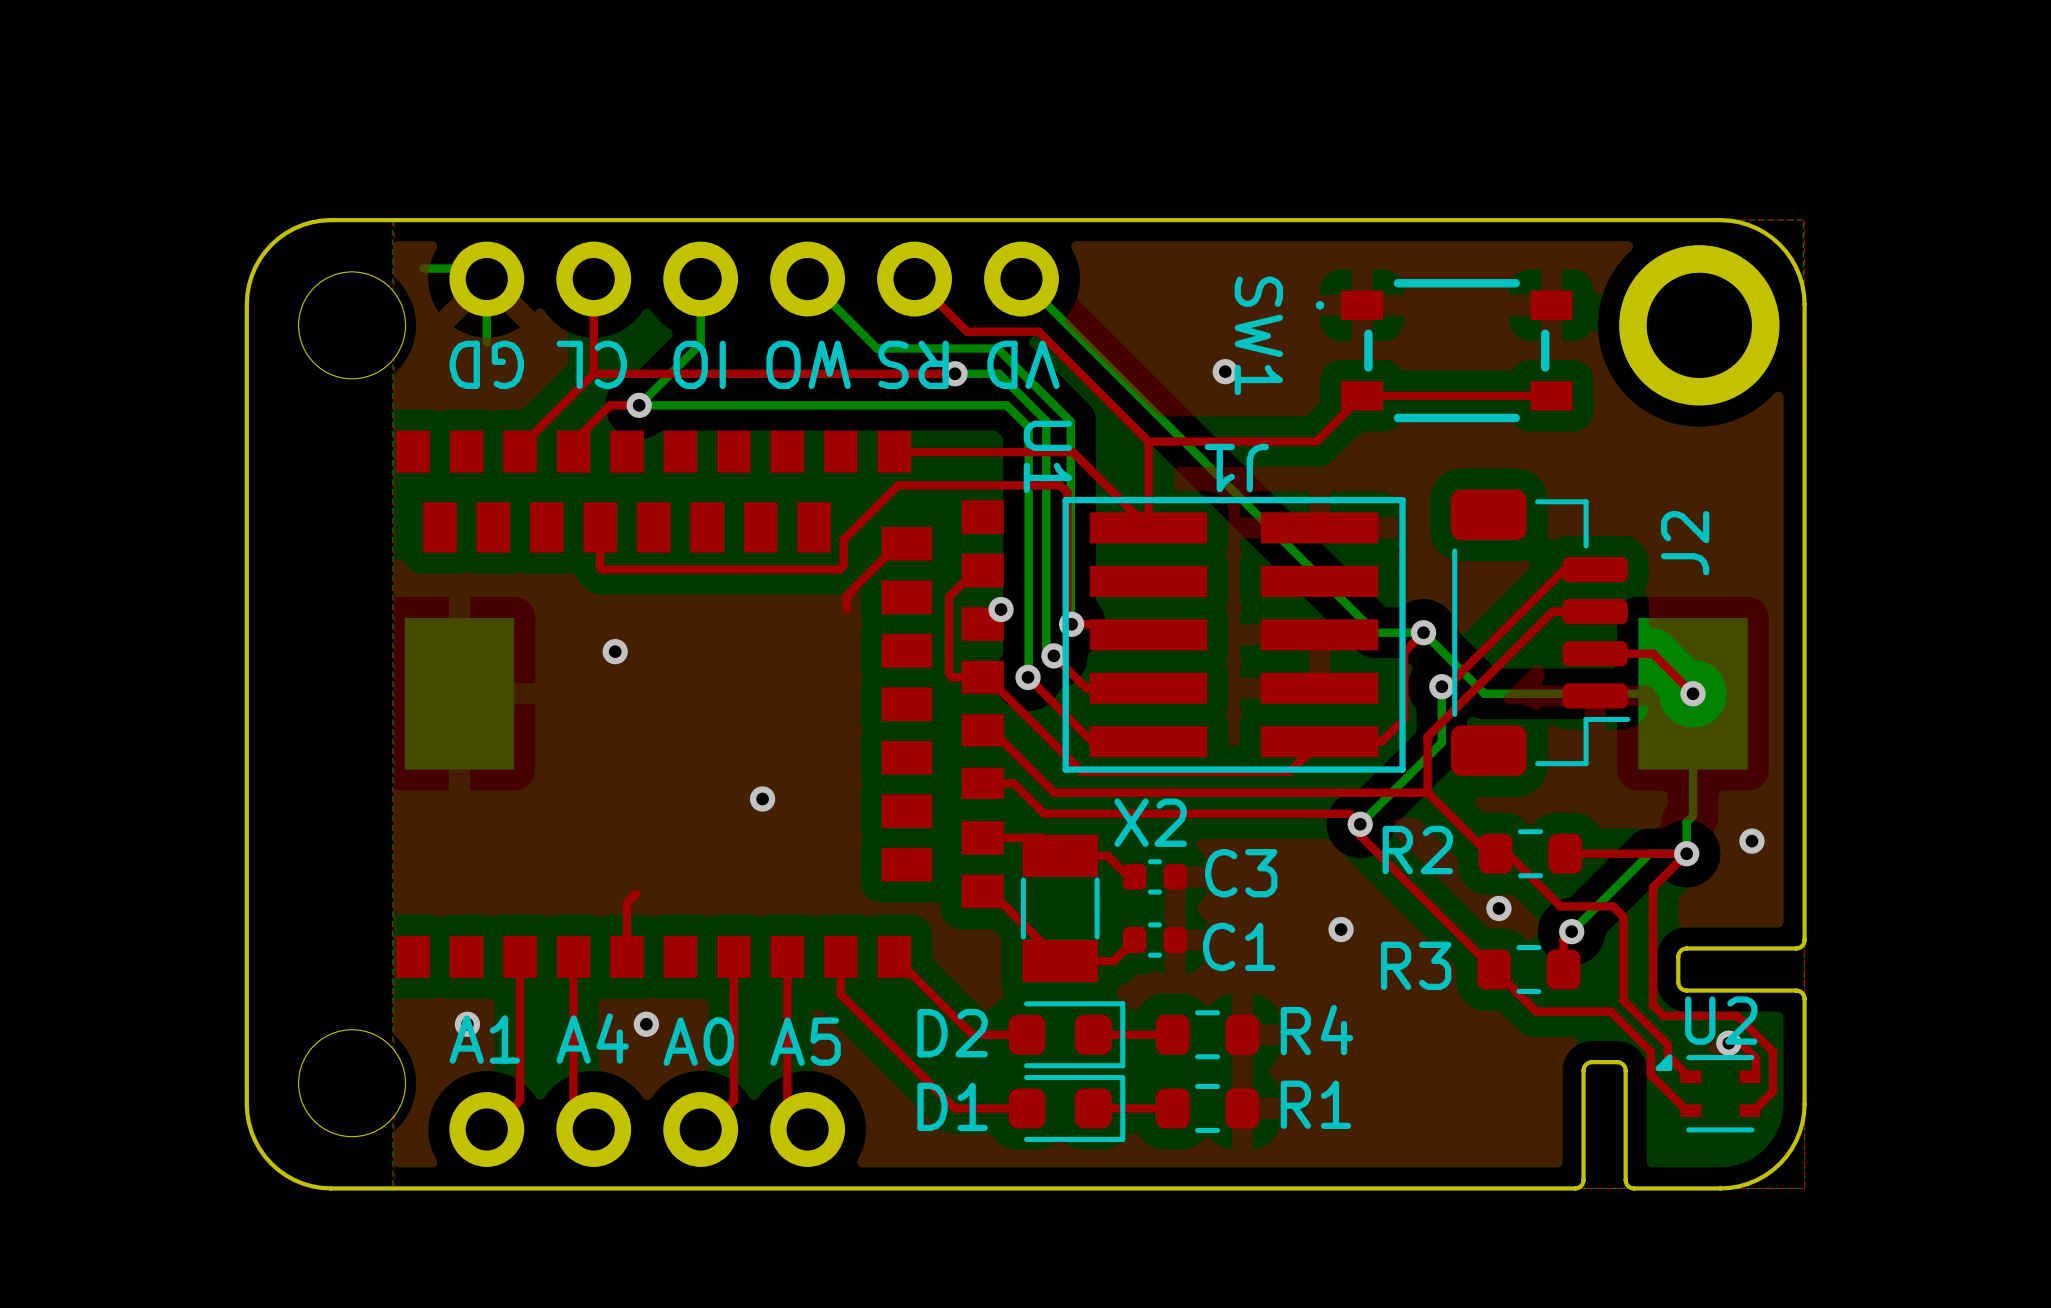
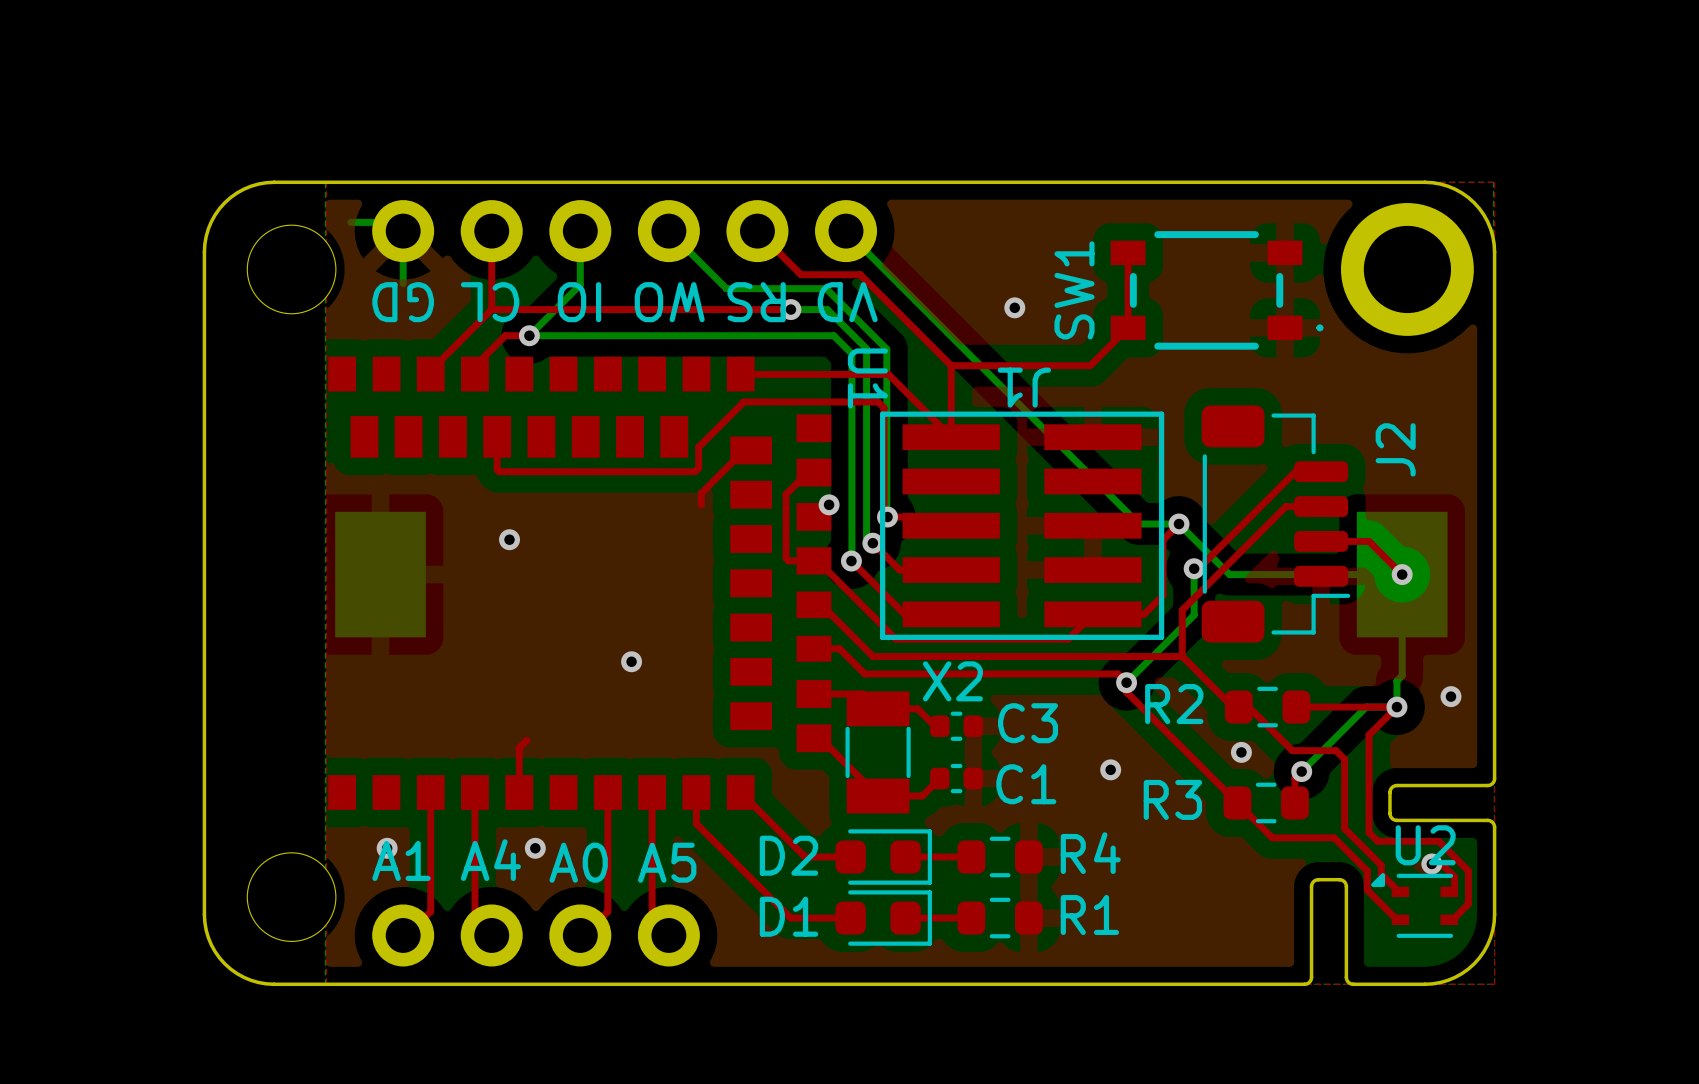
SW1 rotation: 0° (1444, 350) -> 180° (1217, 290)
top track: (1362, 395) (1551, 395) -> (1128, 327) (1128, 252)

